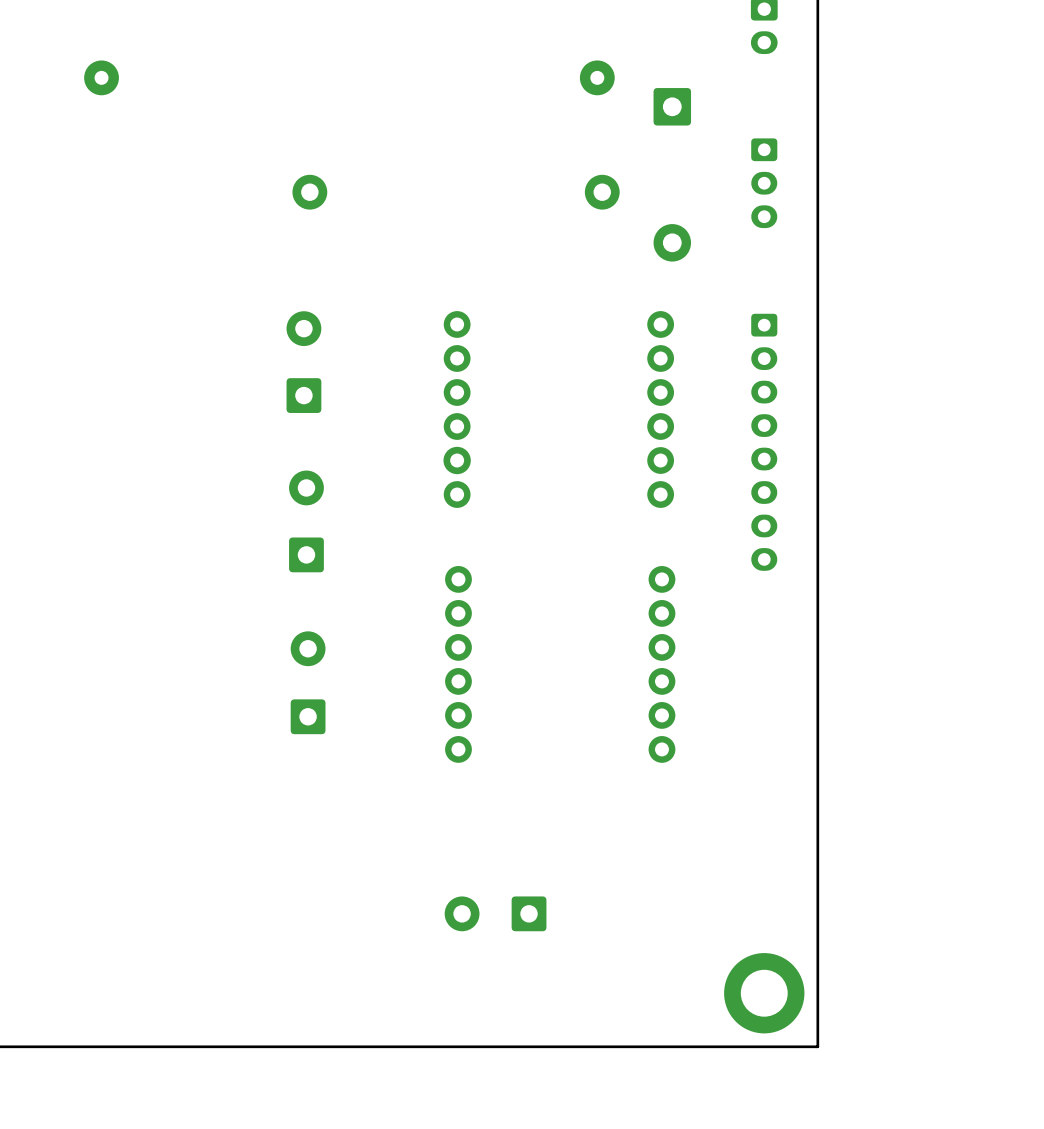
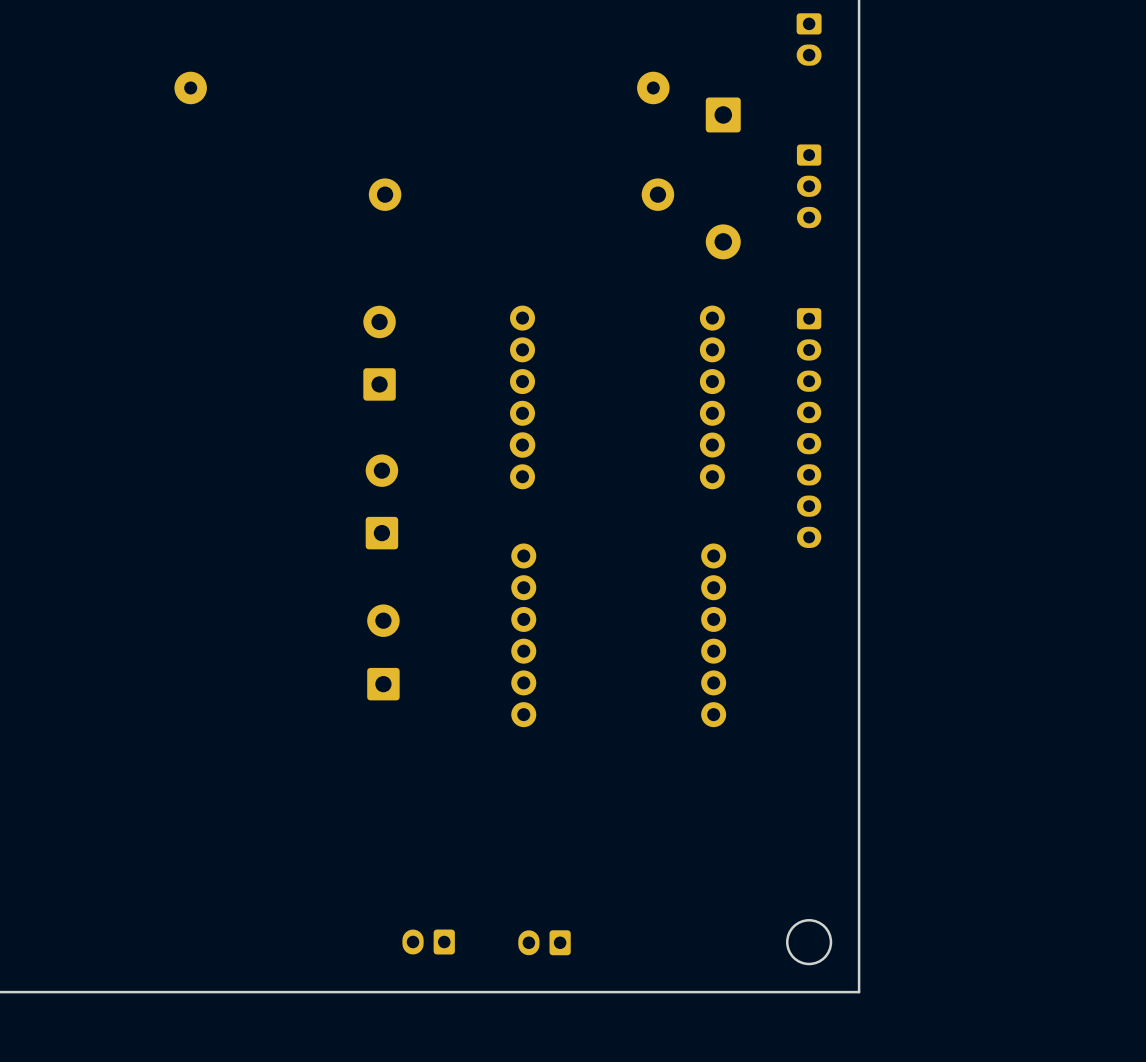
part: (495, 913) -> none
round board edge: none -> [785, 919, 833, 966]
part: none -> (428, 942)
part: none -> (544, 942)
part: (764, 993) -> none

